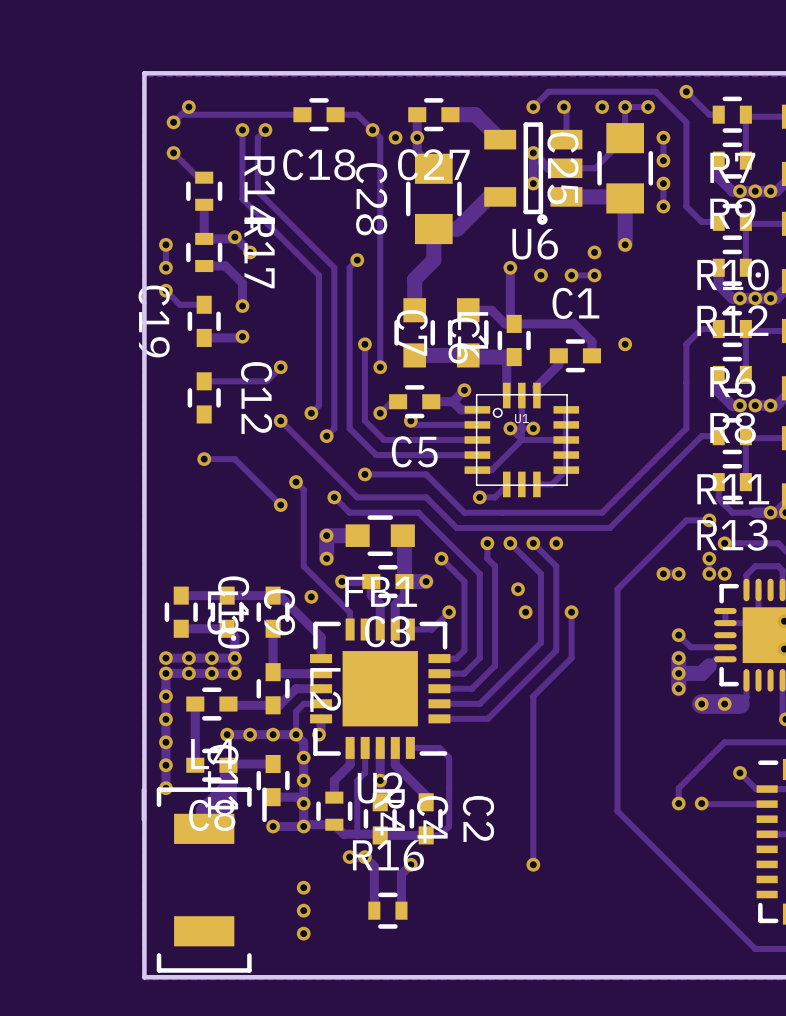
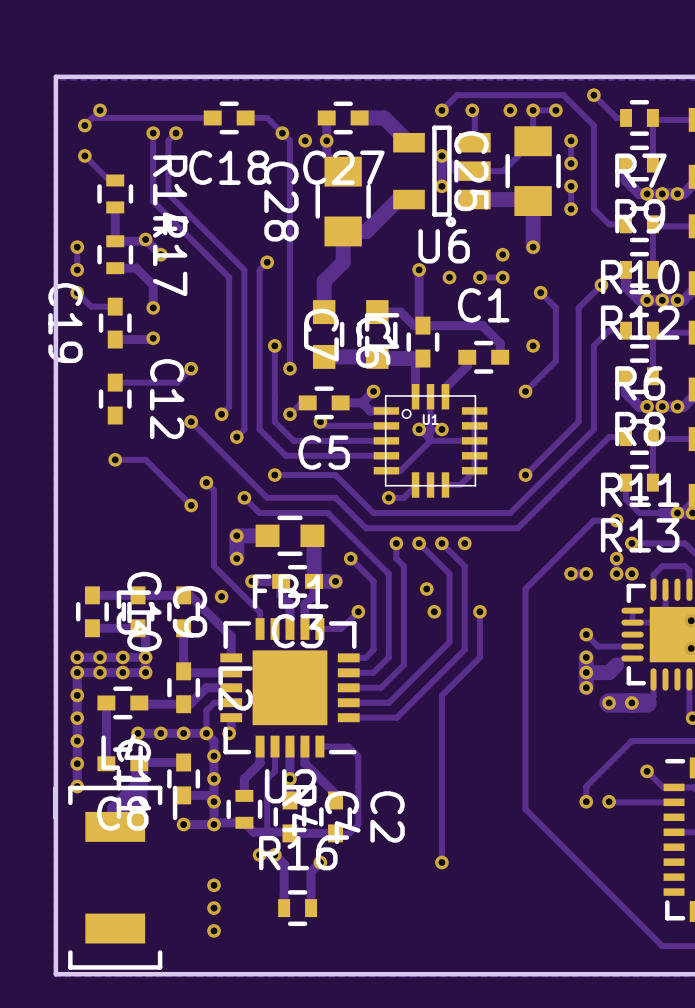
track: none -> (601, 285) (578, 307) (578, 421) (525, 475)
via: none -> (601, 285)
track: none -> (540, 292) (555, 307) (555, 361) (525, 391)
via: none -> (540, 292)
via: none -> (525, 391)
via: none -> (525, 475)

